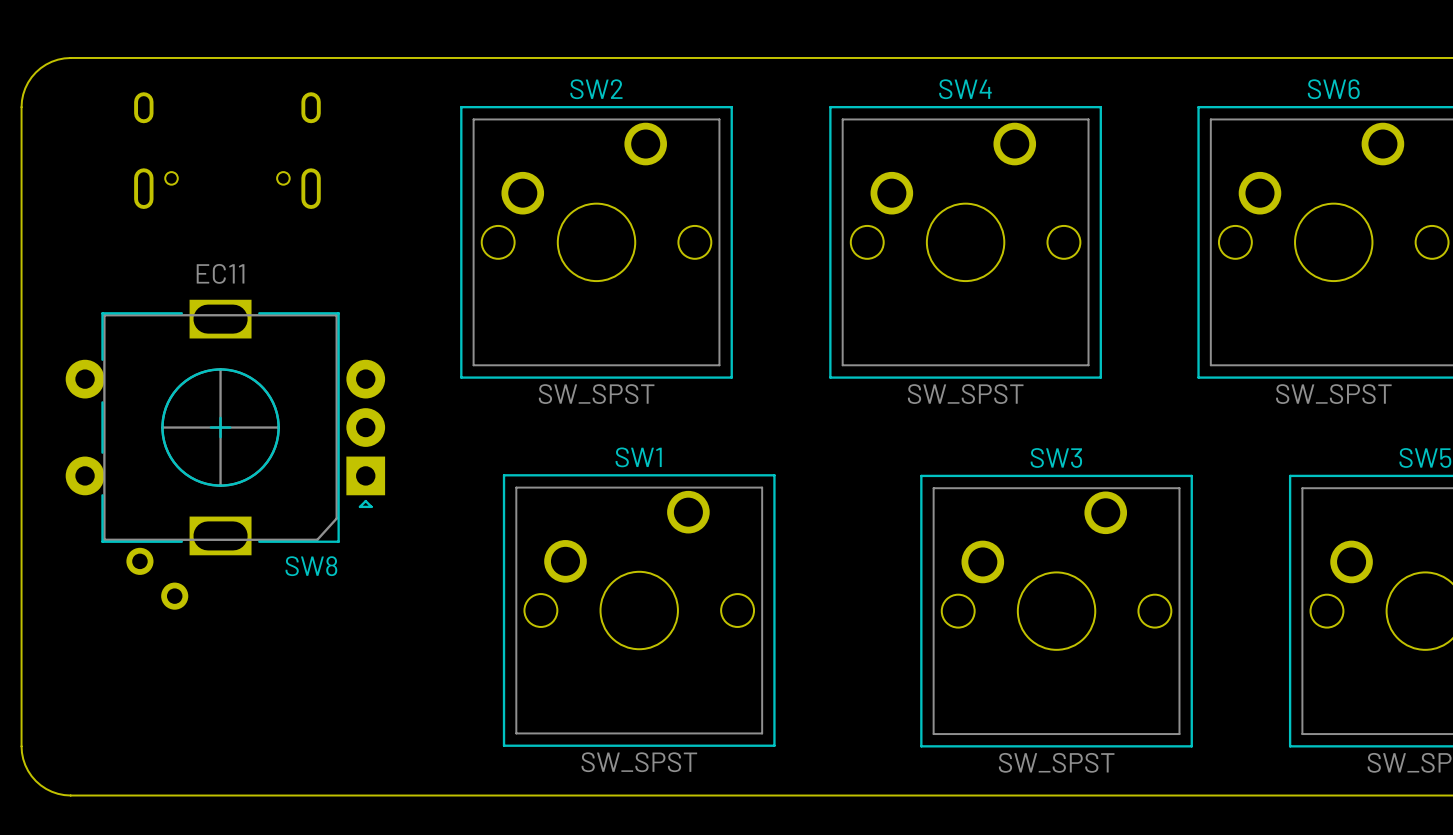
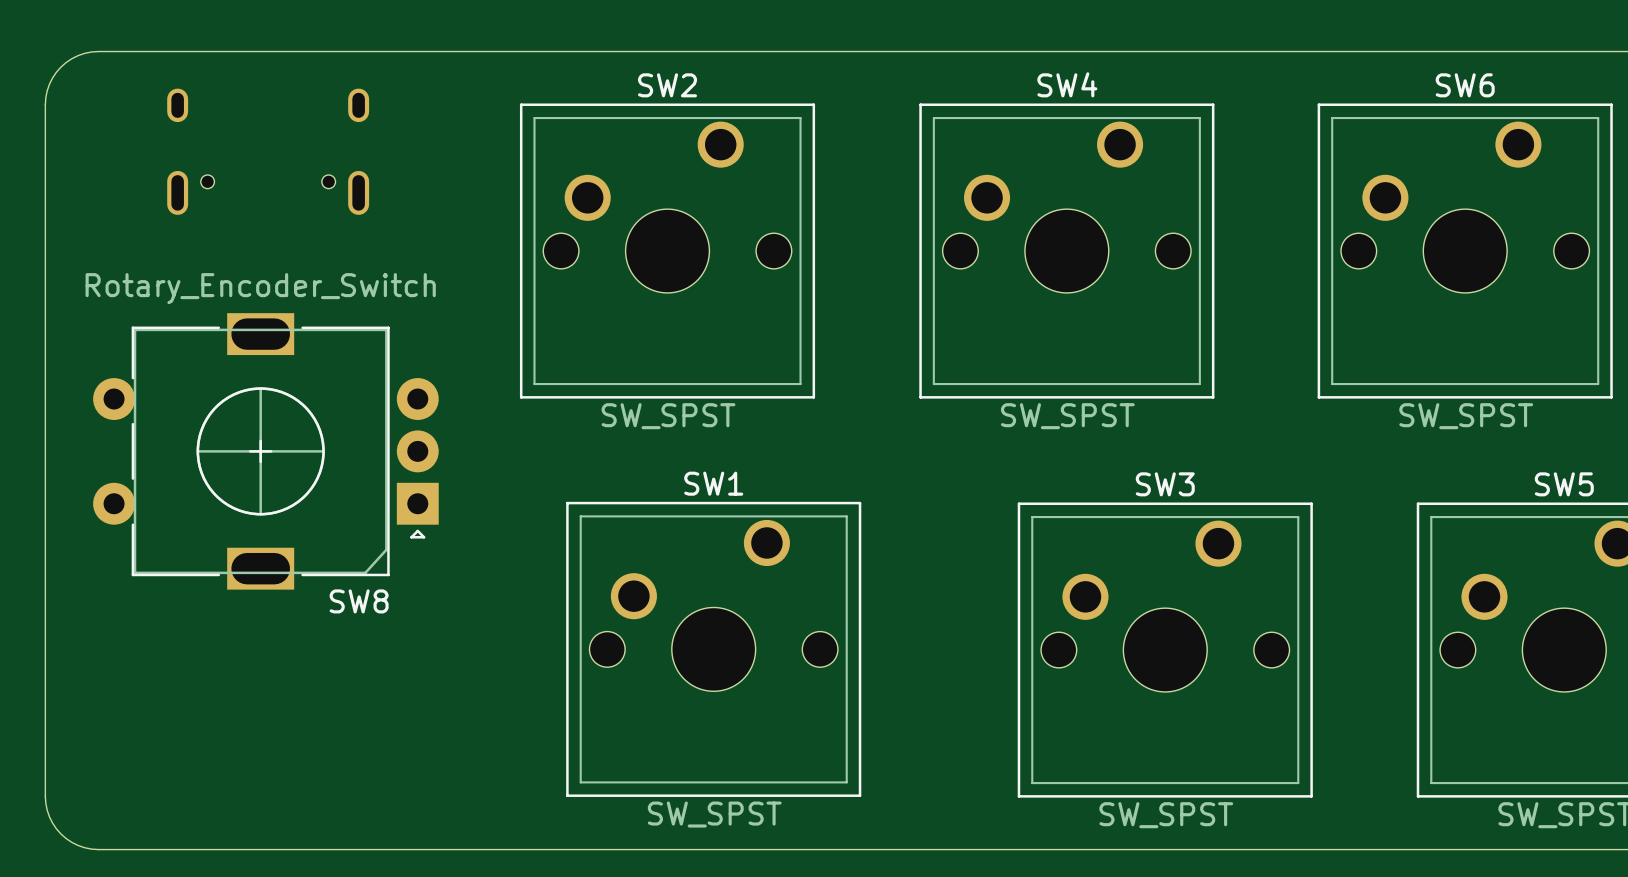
SW8 value: EC11 (220, 273) -> Rotary_Encoder_Switch (260, 288)
part: (157, 578) -> none

